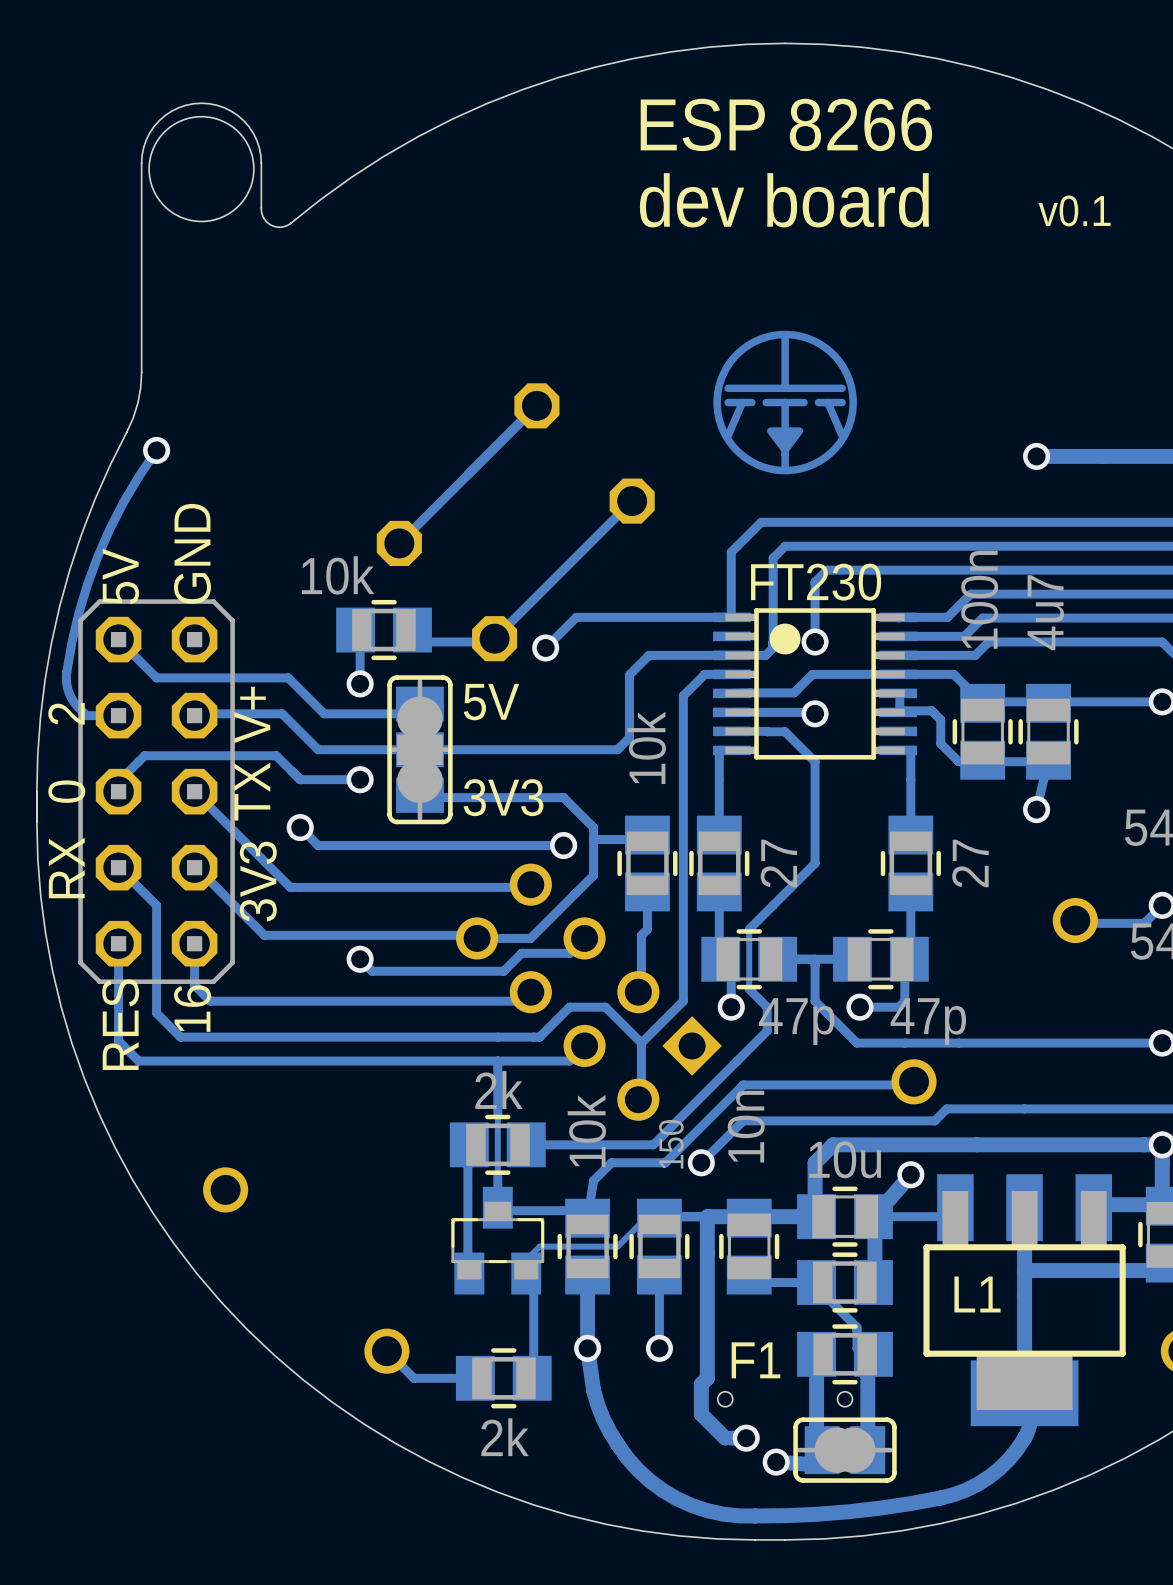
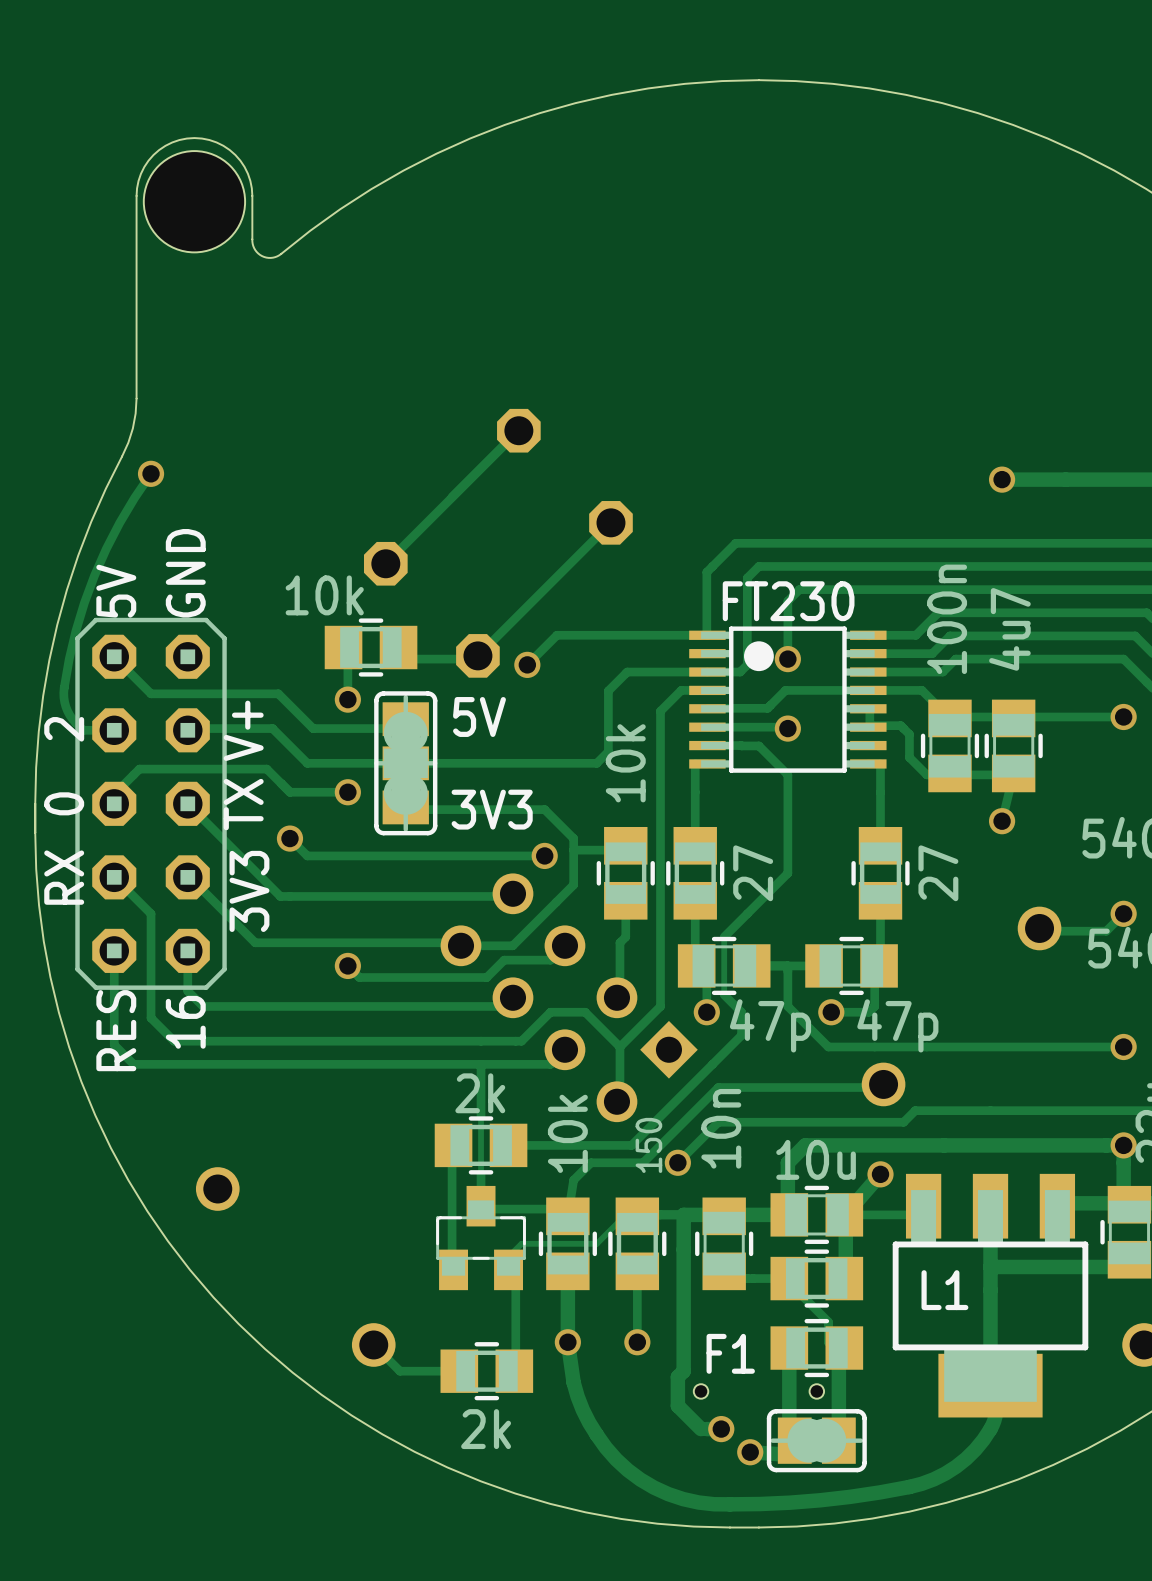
text: ESP 8266 (786, 124) -> none
text: dev board (784, 200) -> none
text: v0.1 (1074, 210) -> none
drawing: [713, 330, 857, 475] -> none

